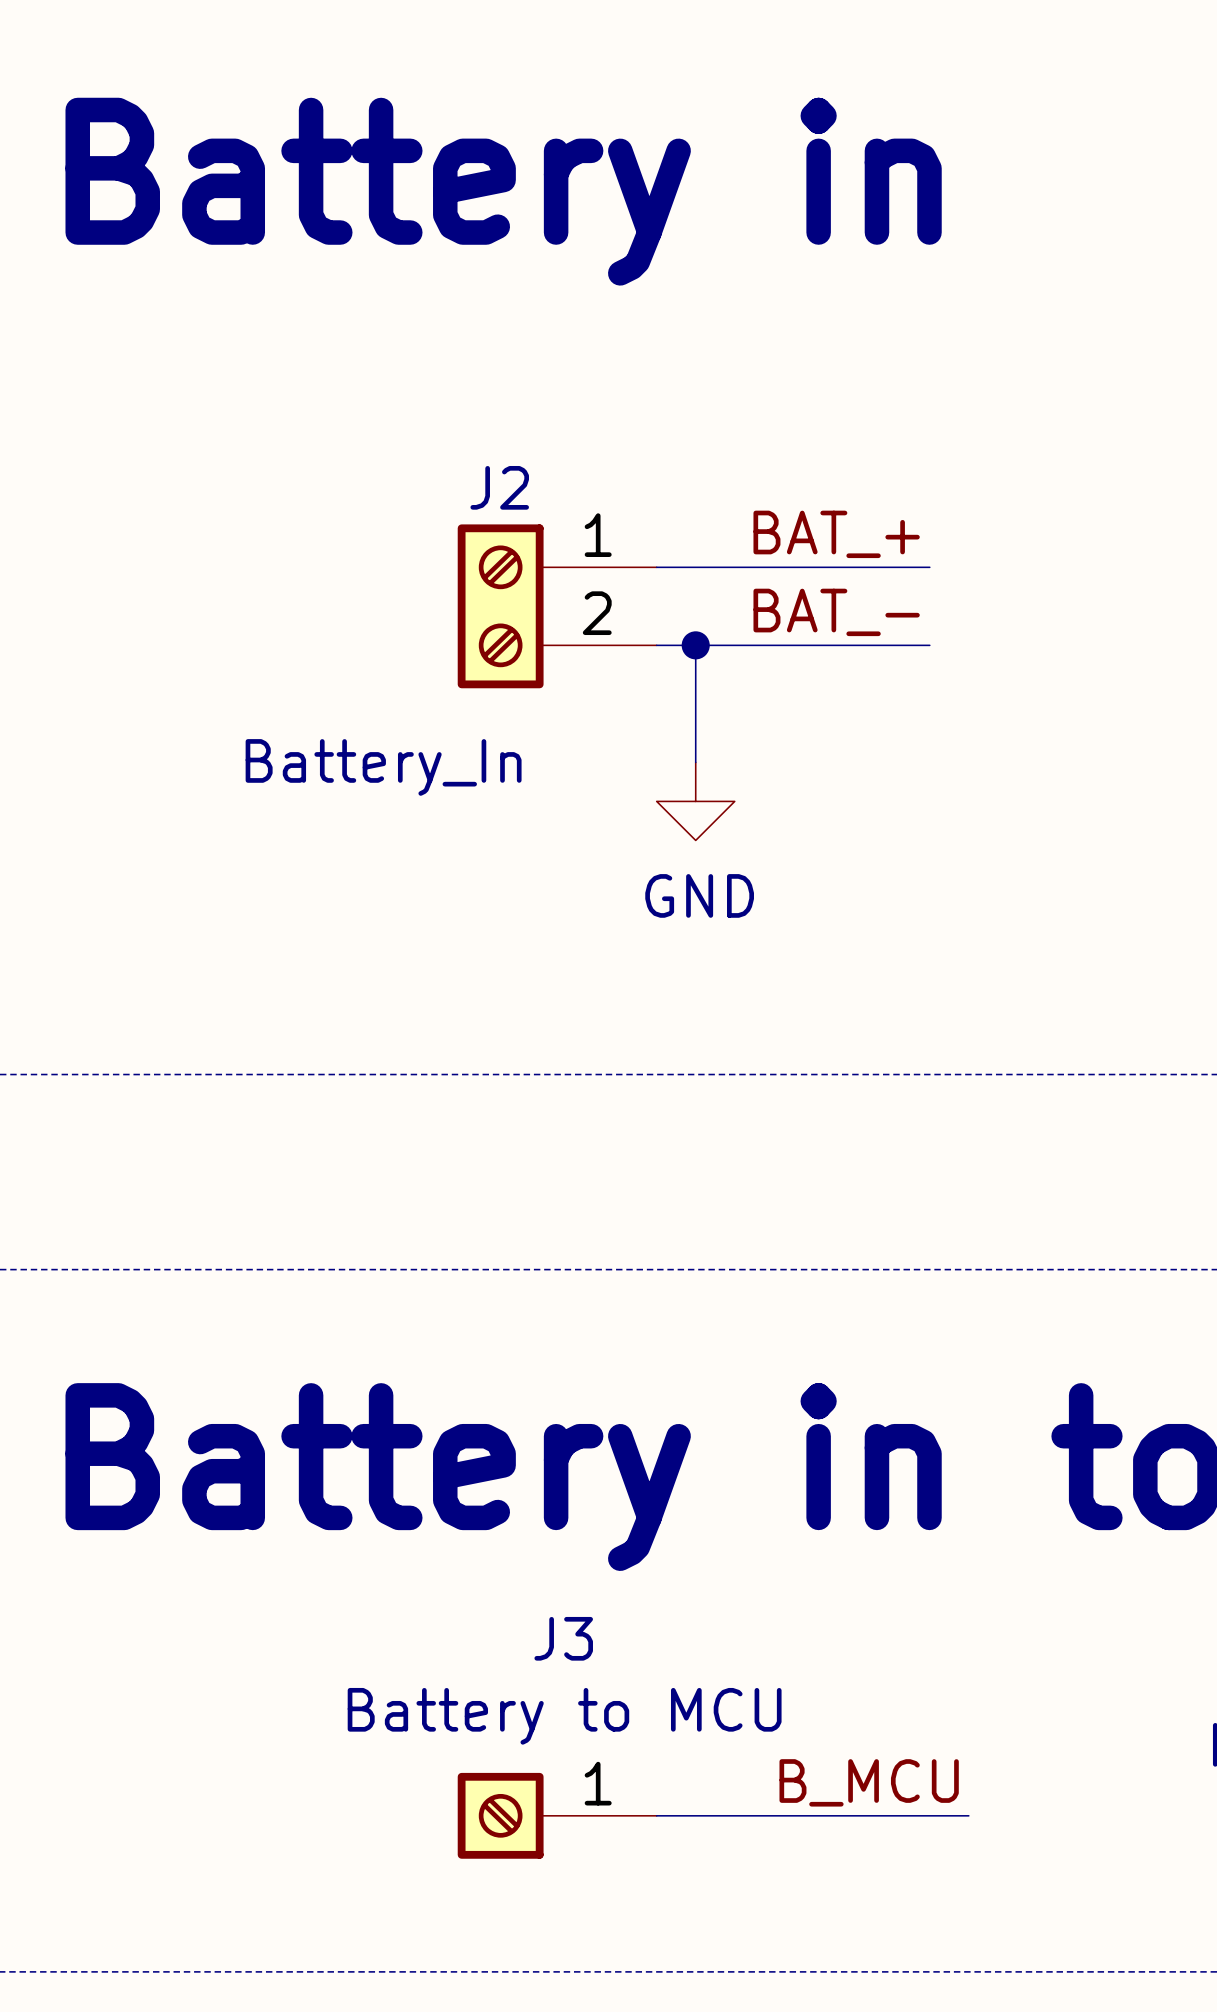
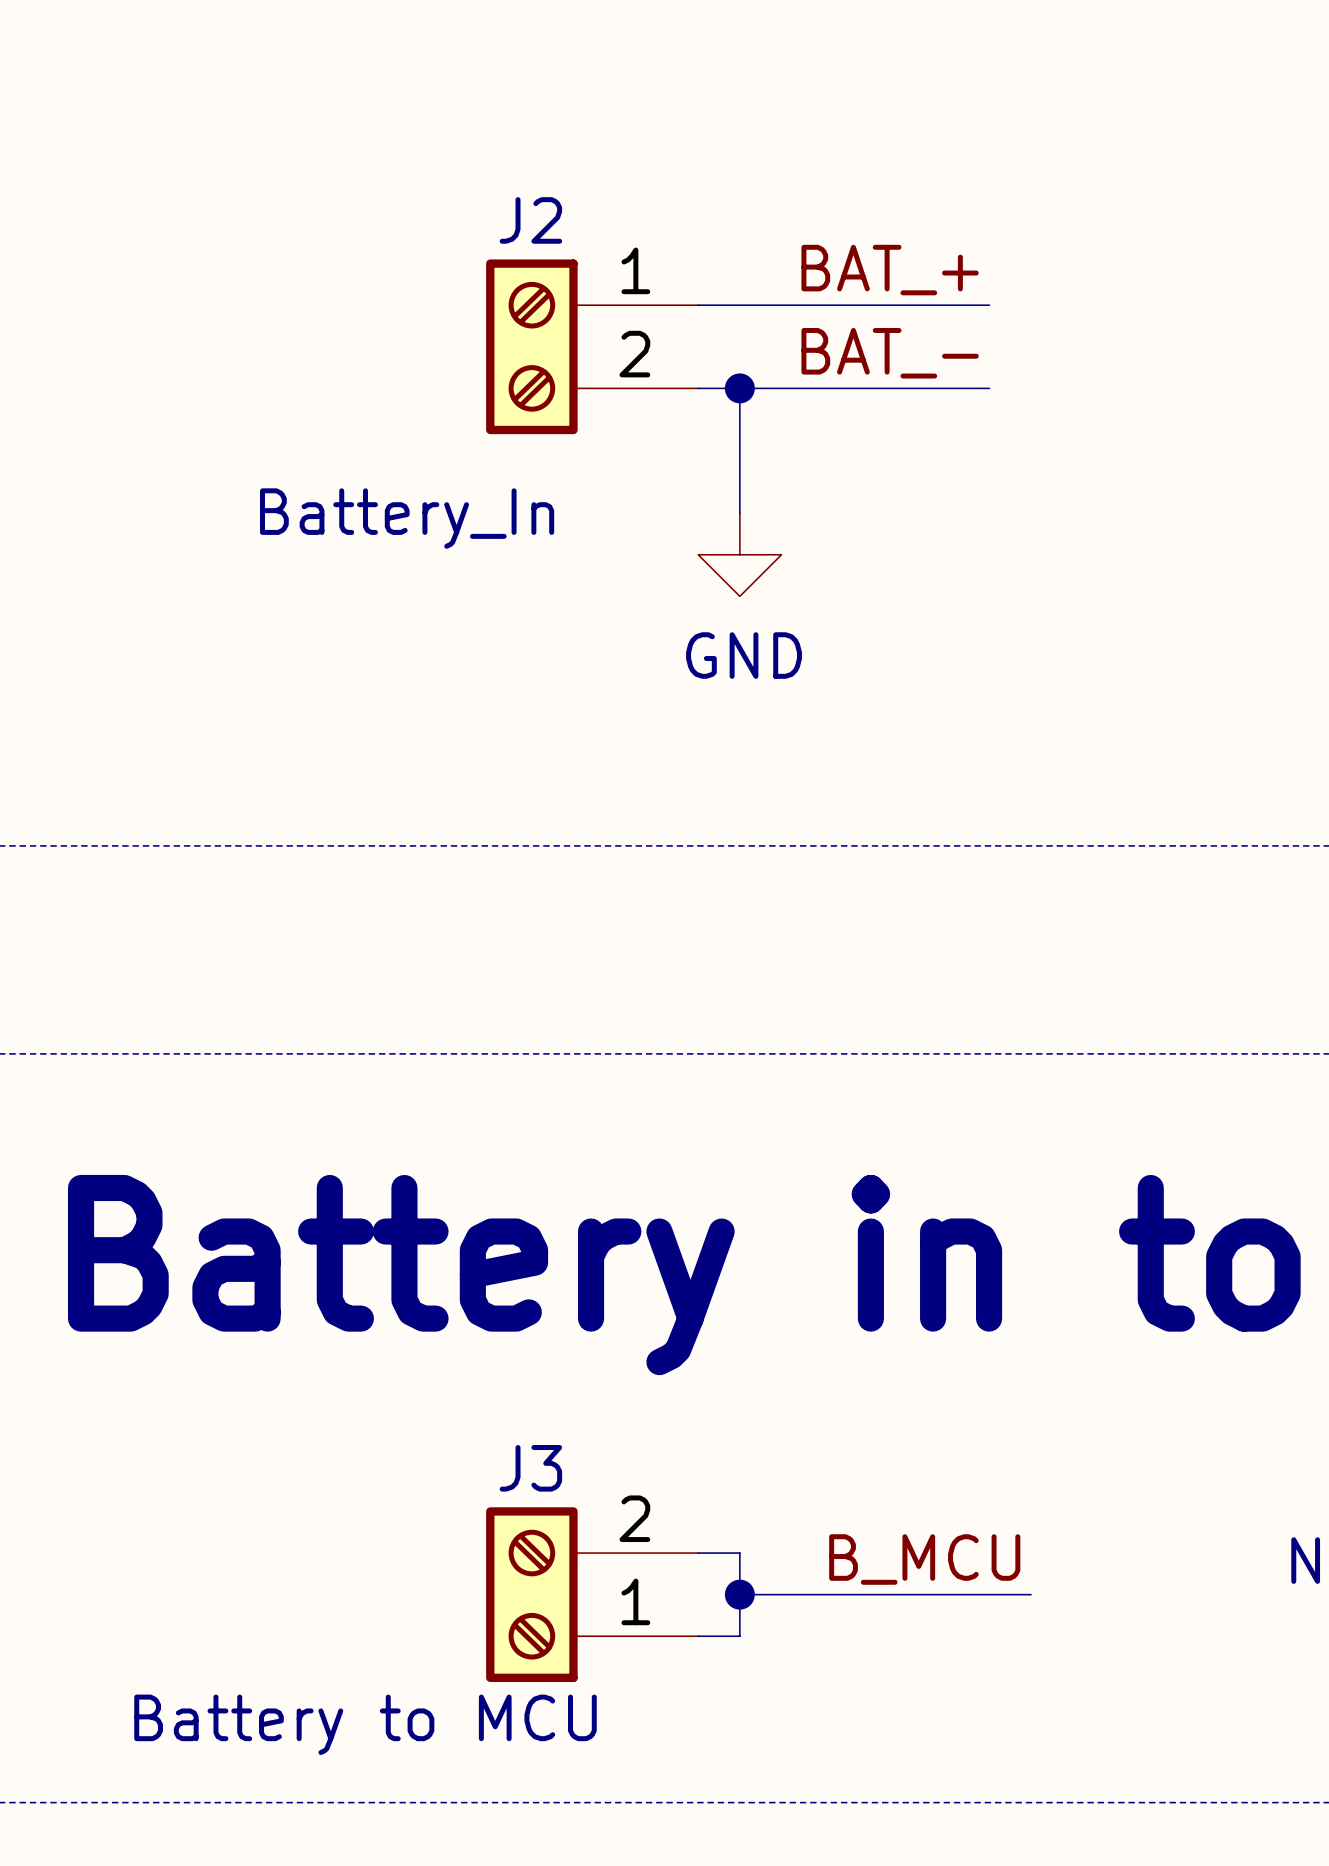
J3 name position: J3 (563, 1638) -> J3 (530, 1468)
J3 value position: Battery to MCU (564, 1716) -> Battery to MCU (365, 1724)
J3 symbol: [457, 1772, 657, 1859] -> [486, 1507, 699, 1682]
wire: none -> (739, 1594) (1031, 1594)
junction: none -> (739, 1594)
label position: B_MCU (869, 1782) -> B_MCU (924, 1559)
wire: (695, 1815) (968, 1815) -> (739, 1636) (739, 1553) (698, 1553)

